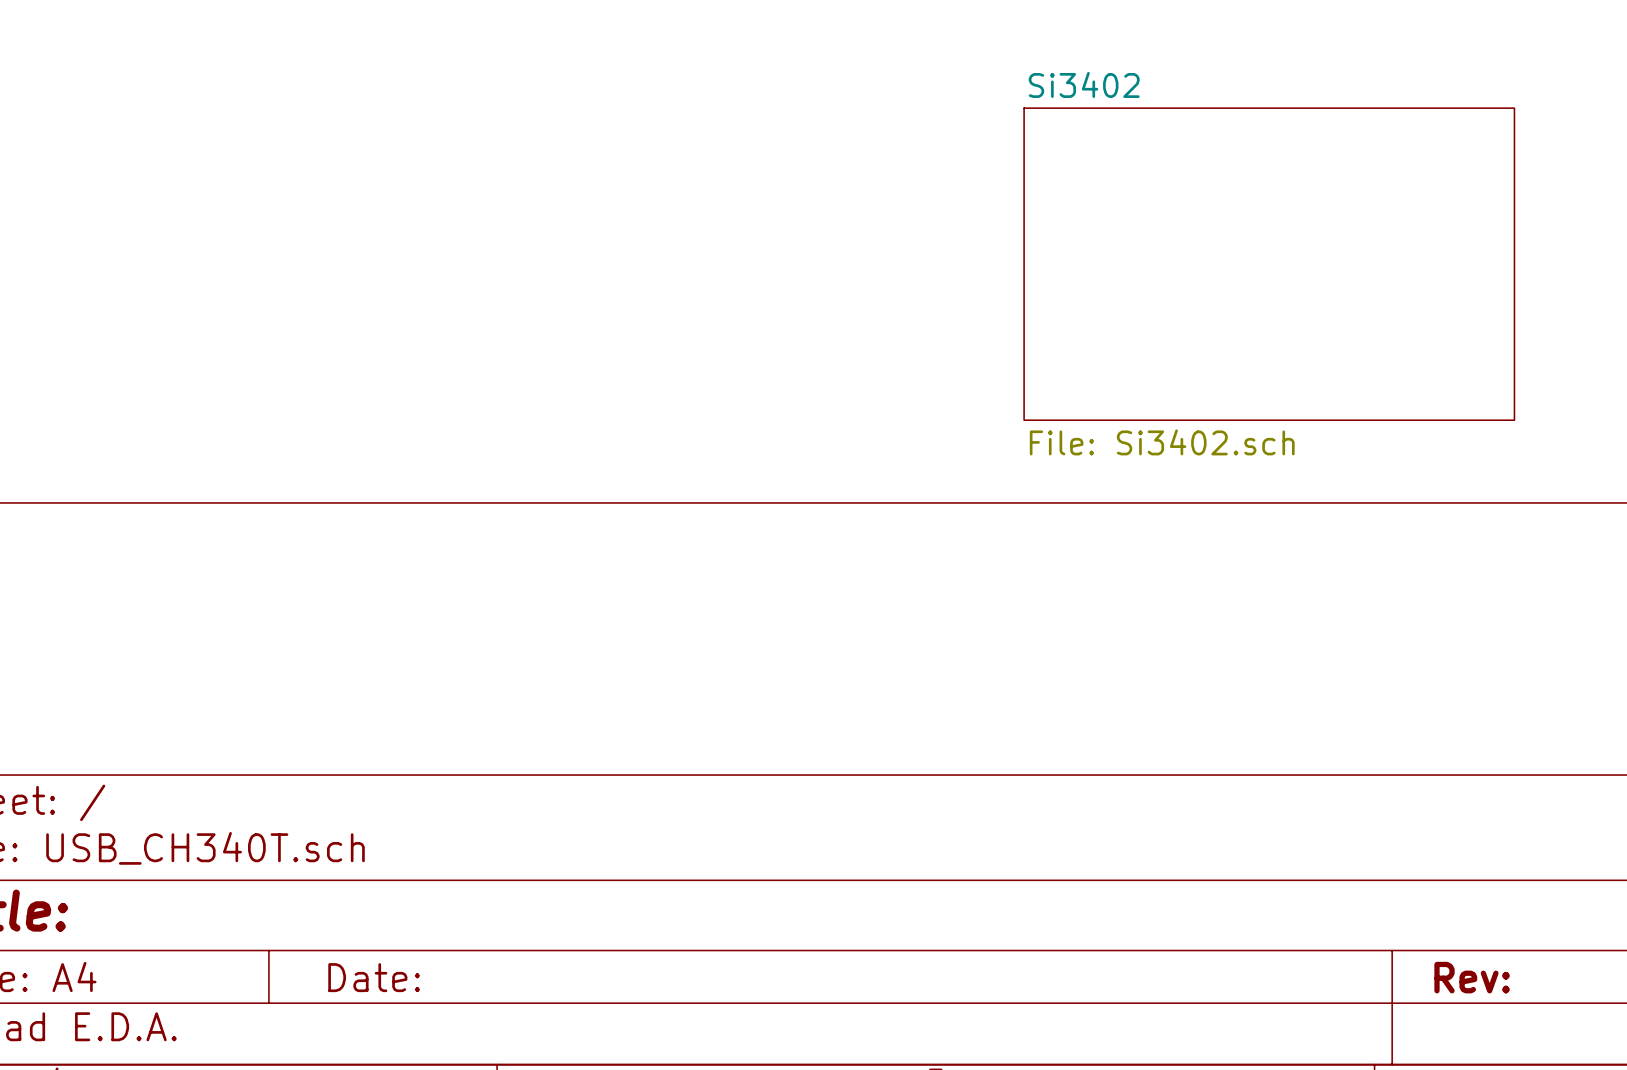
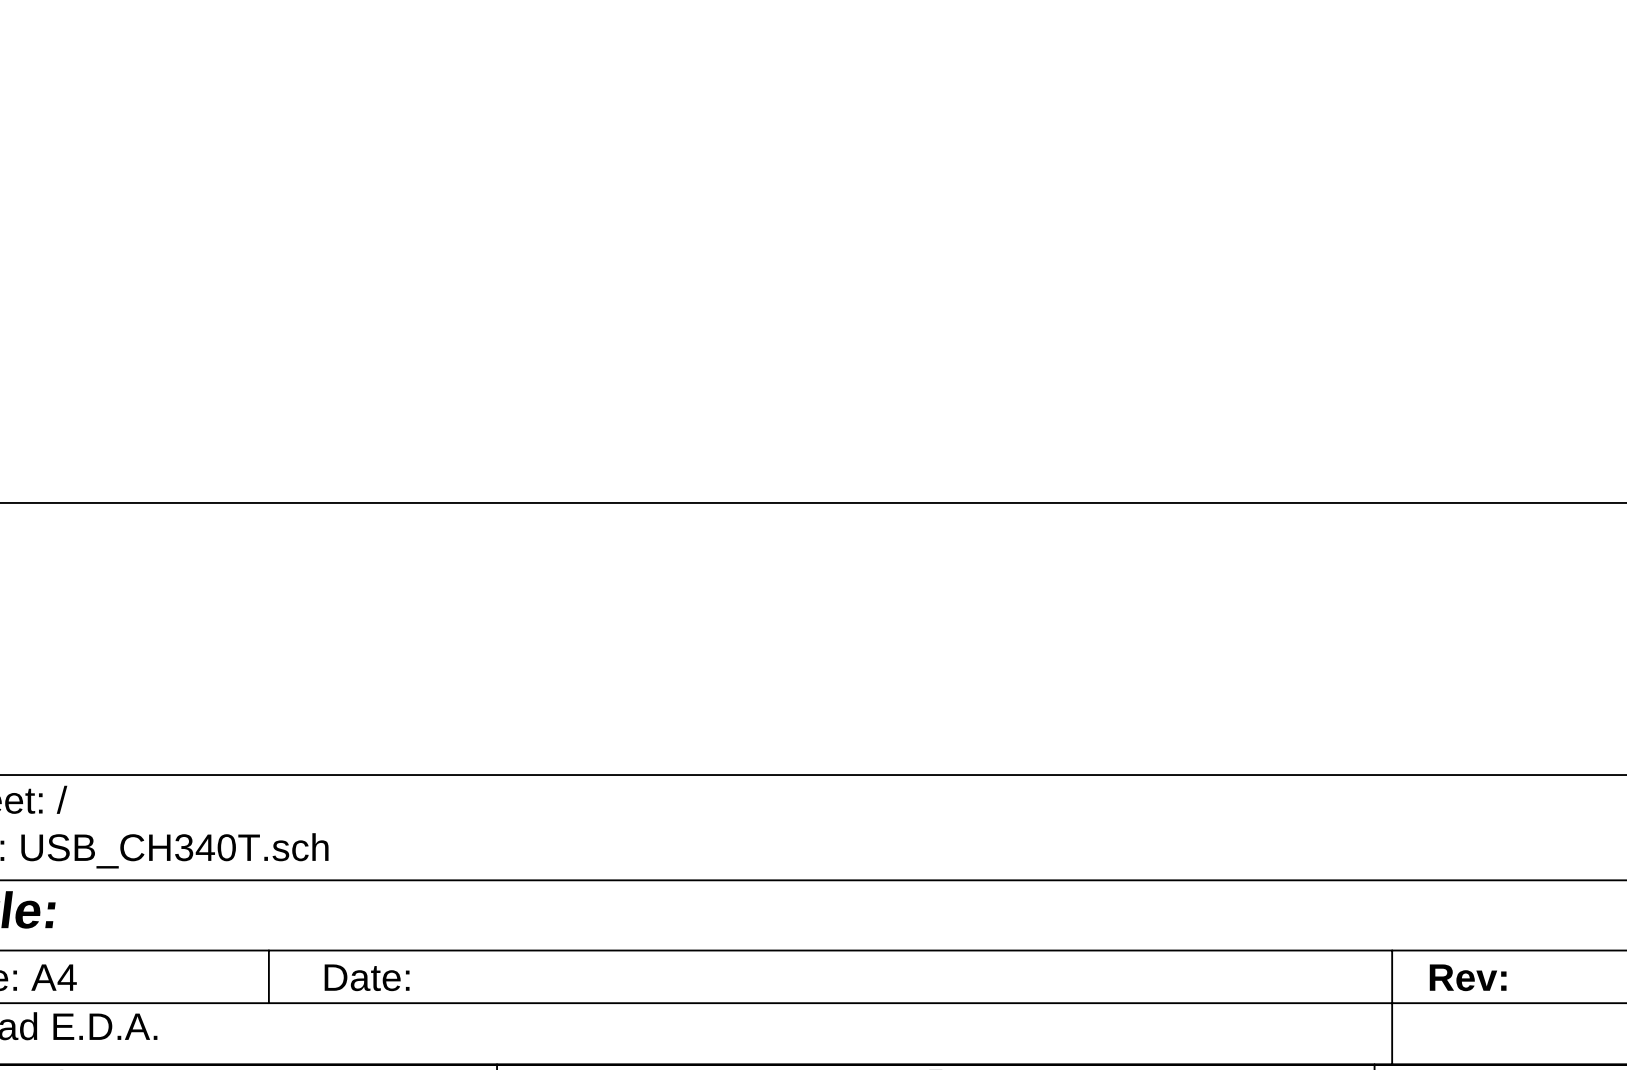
sheet Si3402: File: Si3402.sch (1269, 264) -> none

